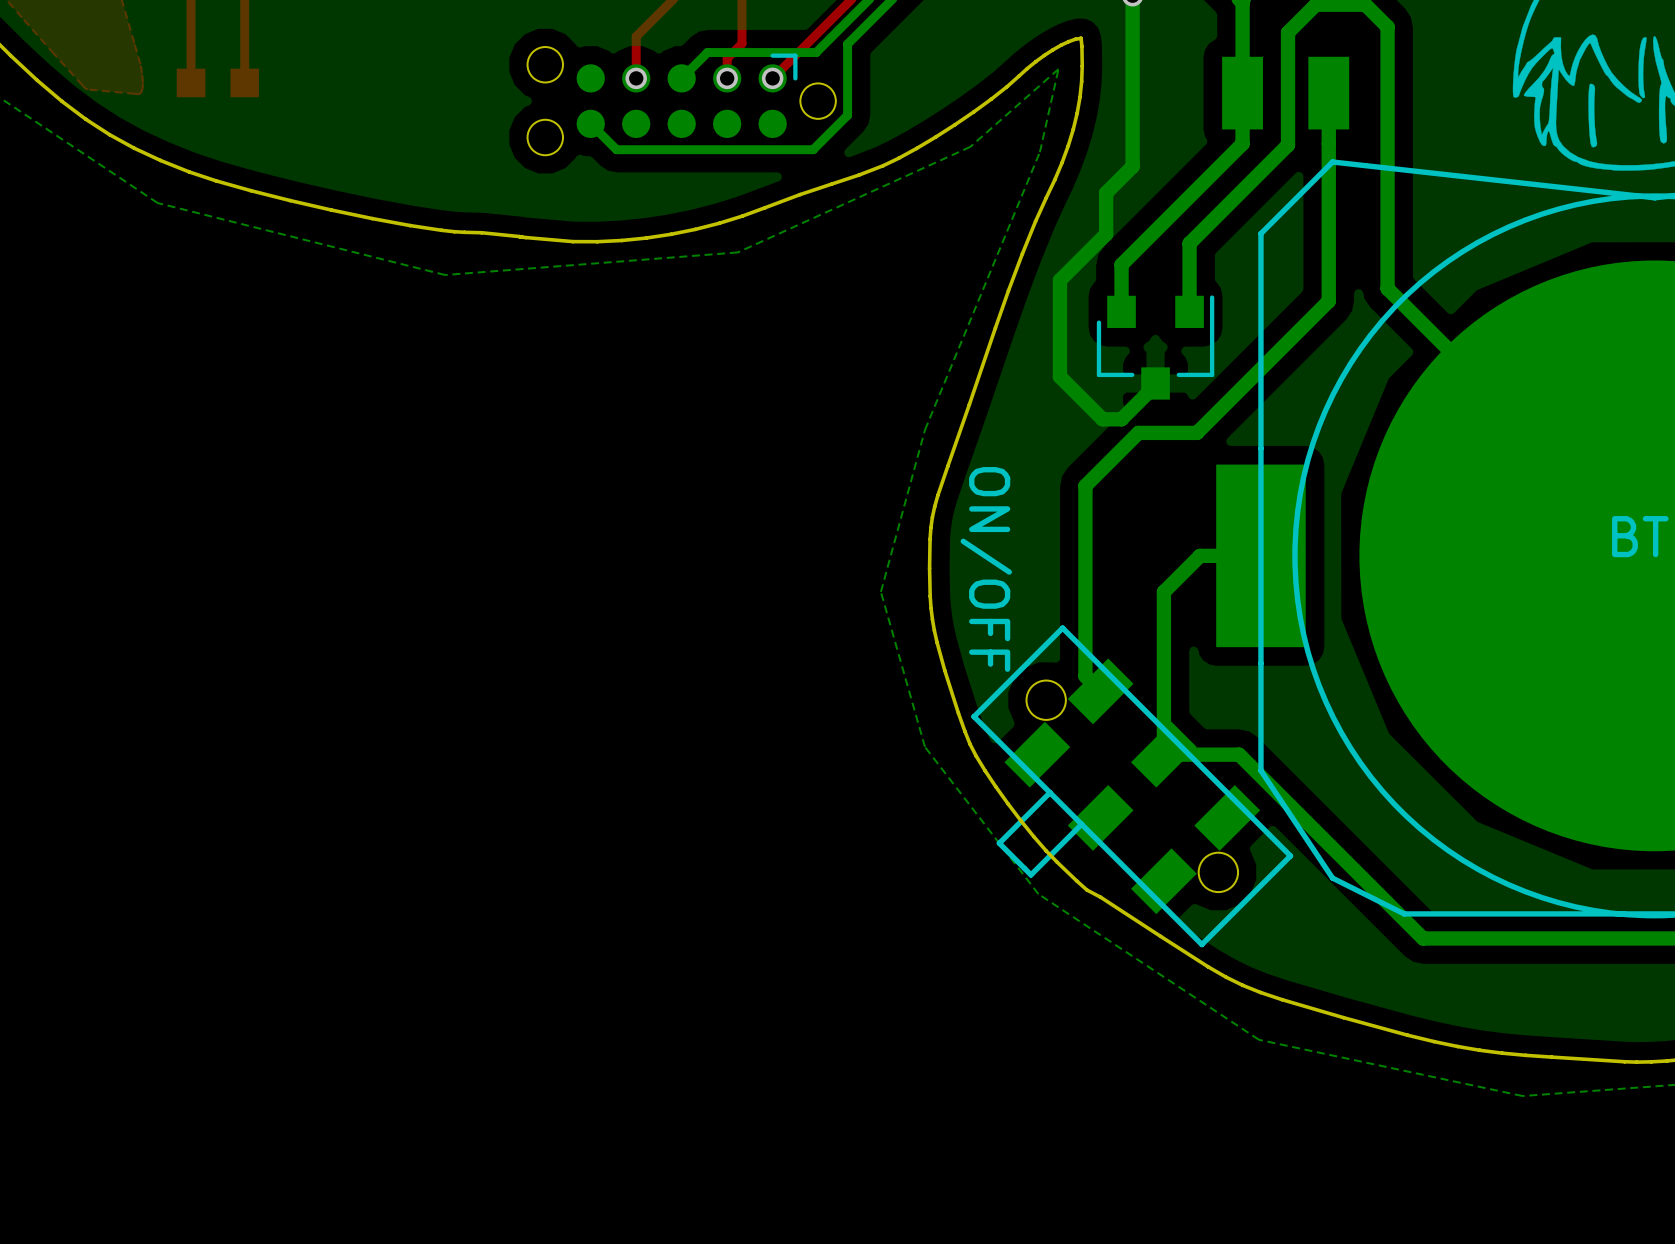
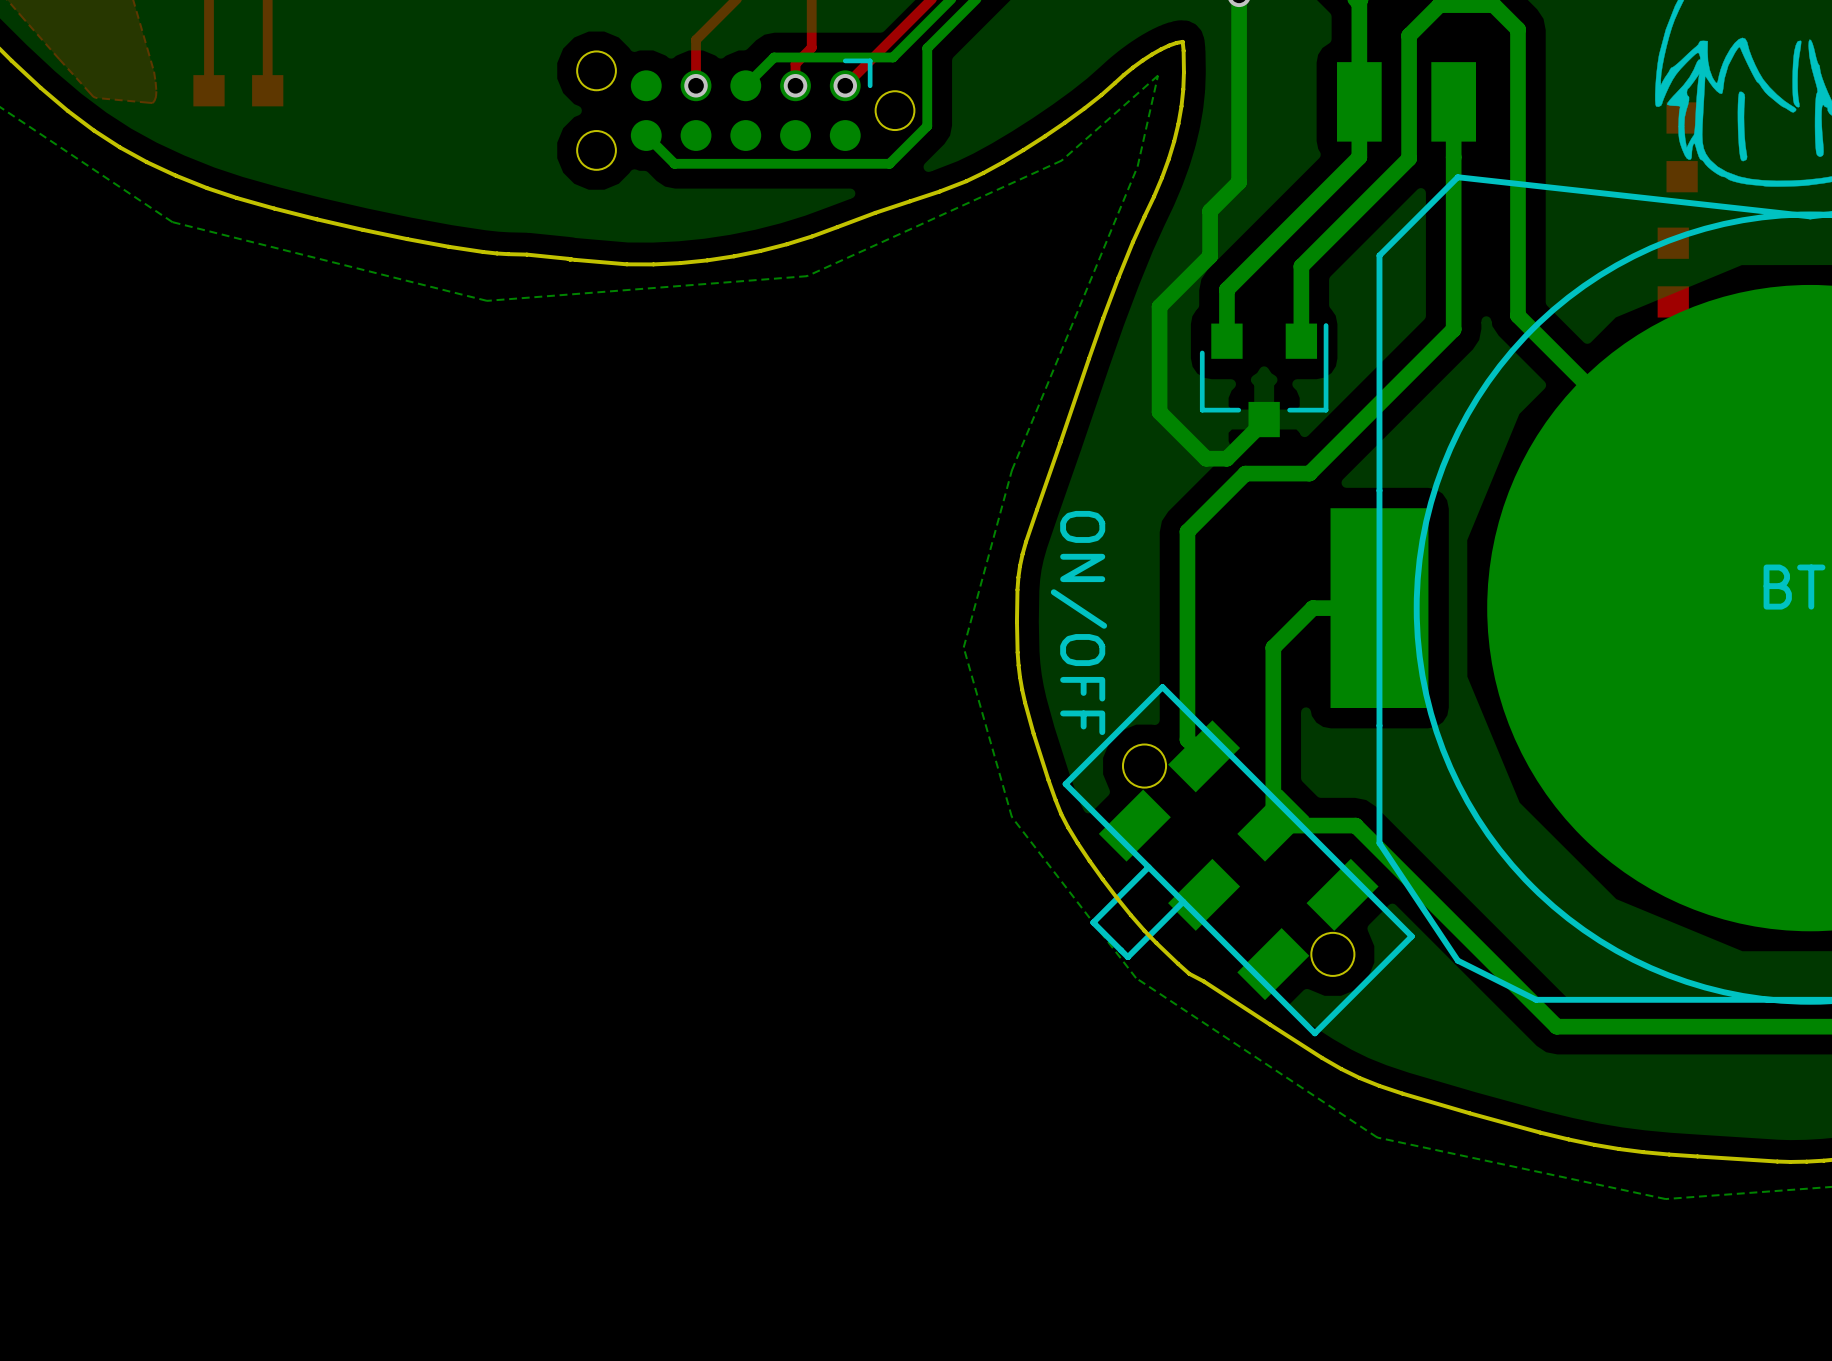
part: none -> (1682, 147)
part: none -> (1673, 272)

